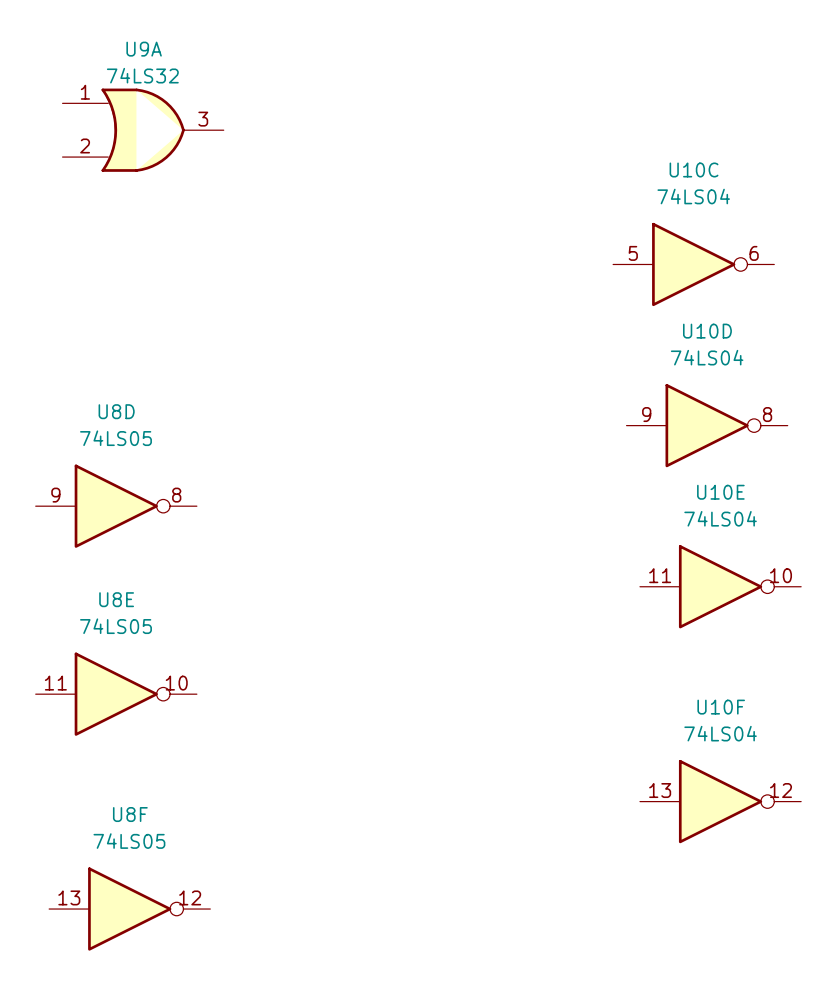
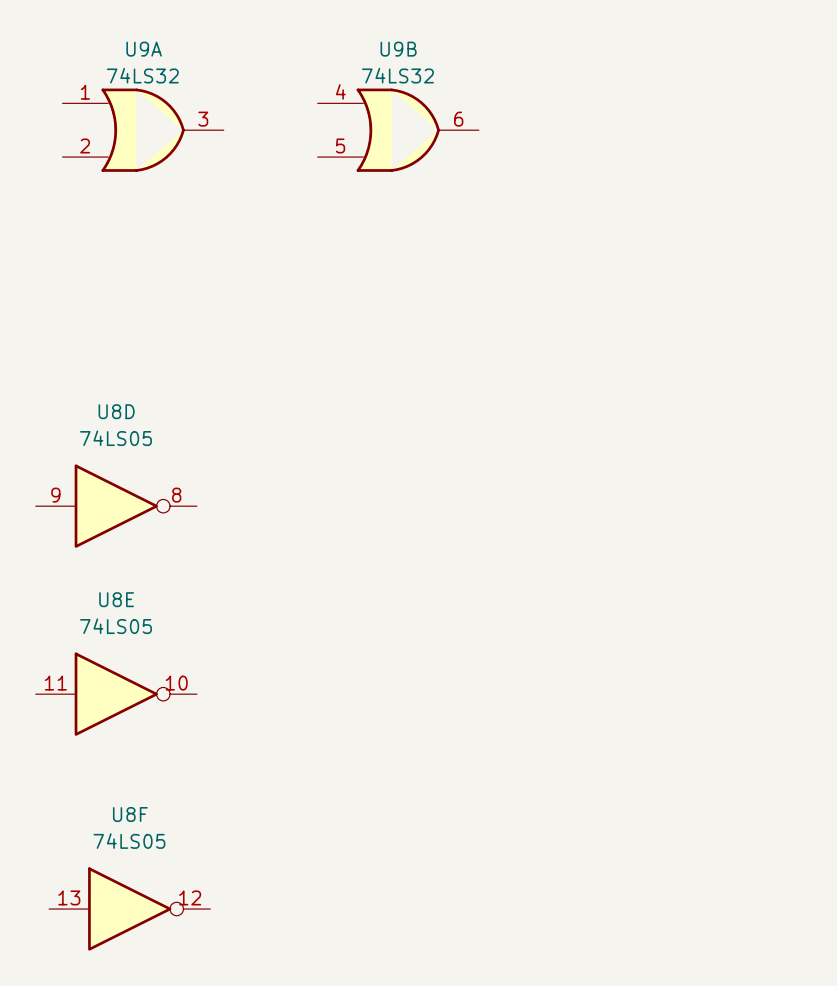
U9B: none -> 74LS32 (398, 130)
U10C: 74LS04 (693, 264) -> none
U10D: 74LS04 (707, 425) -> none
U10E: 74LS04 (720, 586) -> none
U10F: 74LS04 (720, 801) -> none

